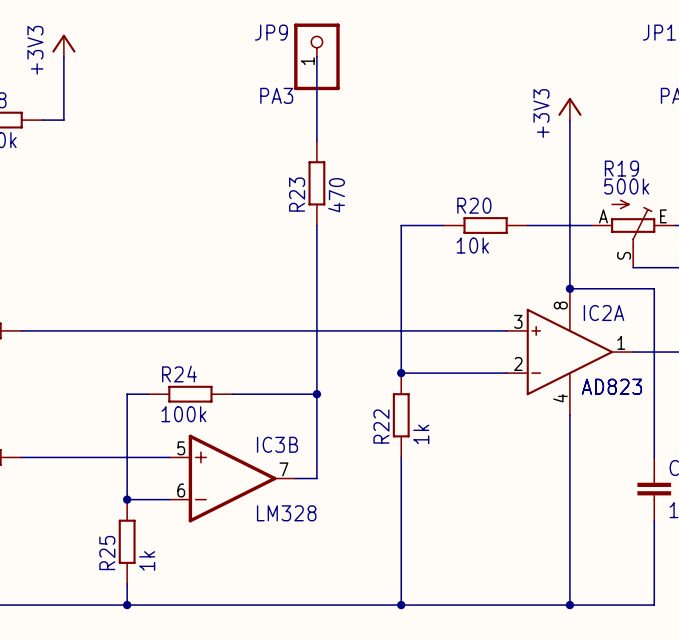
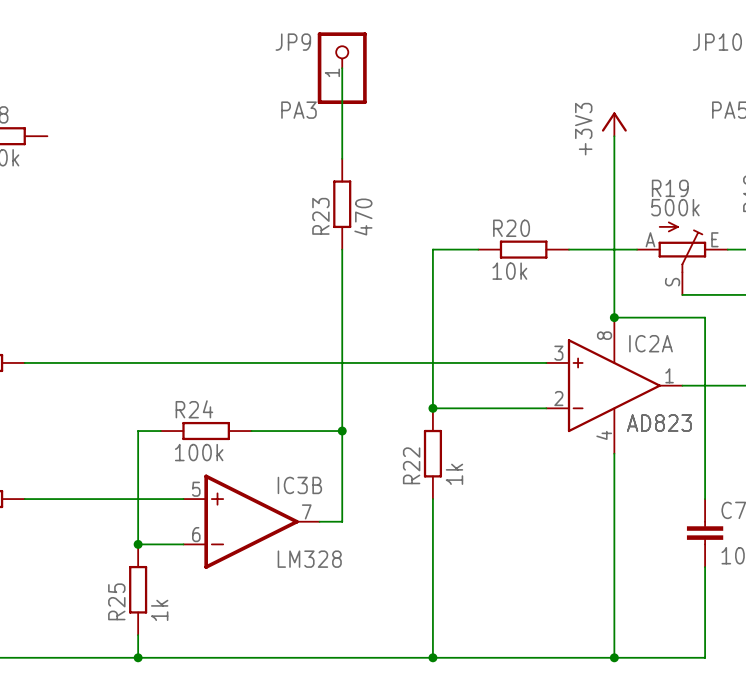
power symbol: +3V3 (63, 45) -> none
wire: (63, 56) (63, 120) (42, 120) -> none

